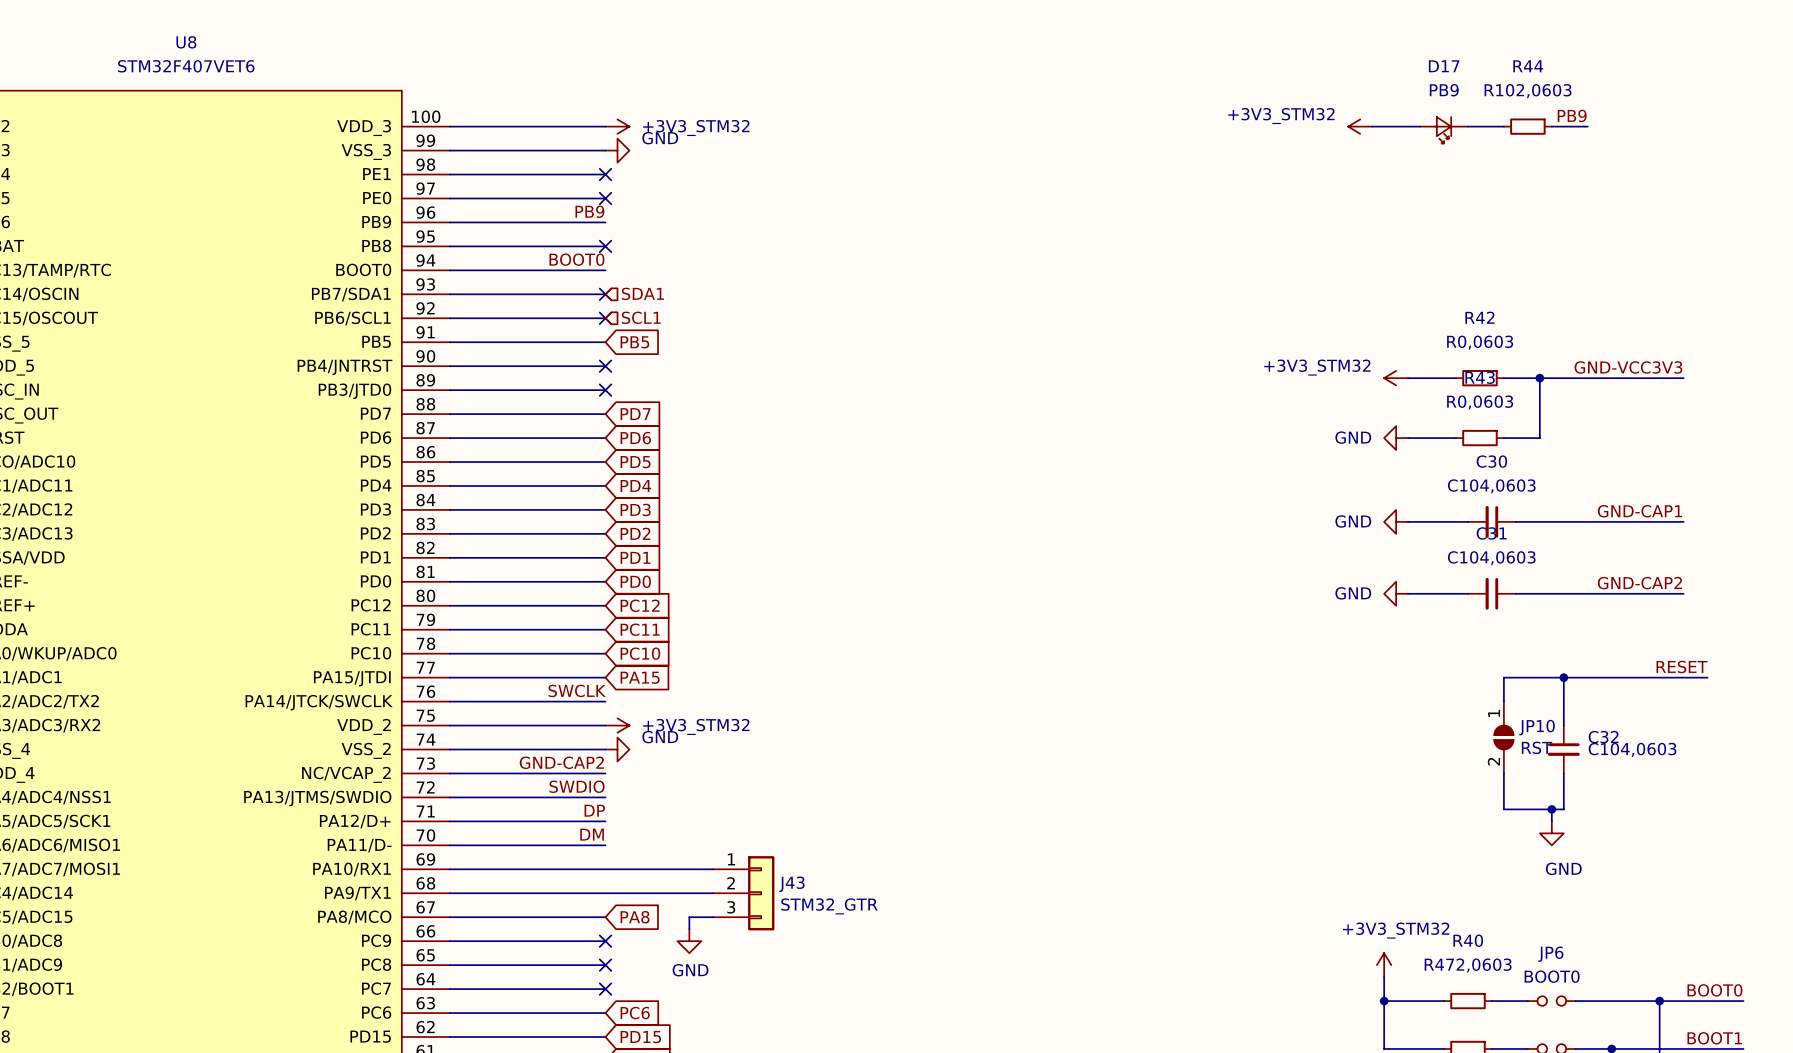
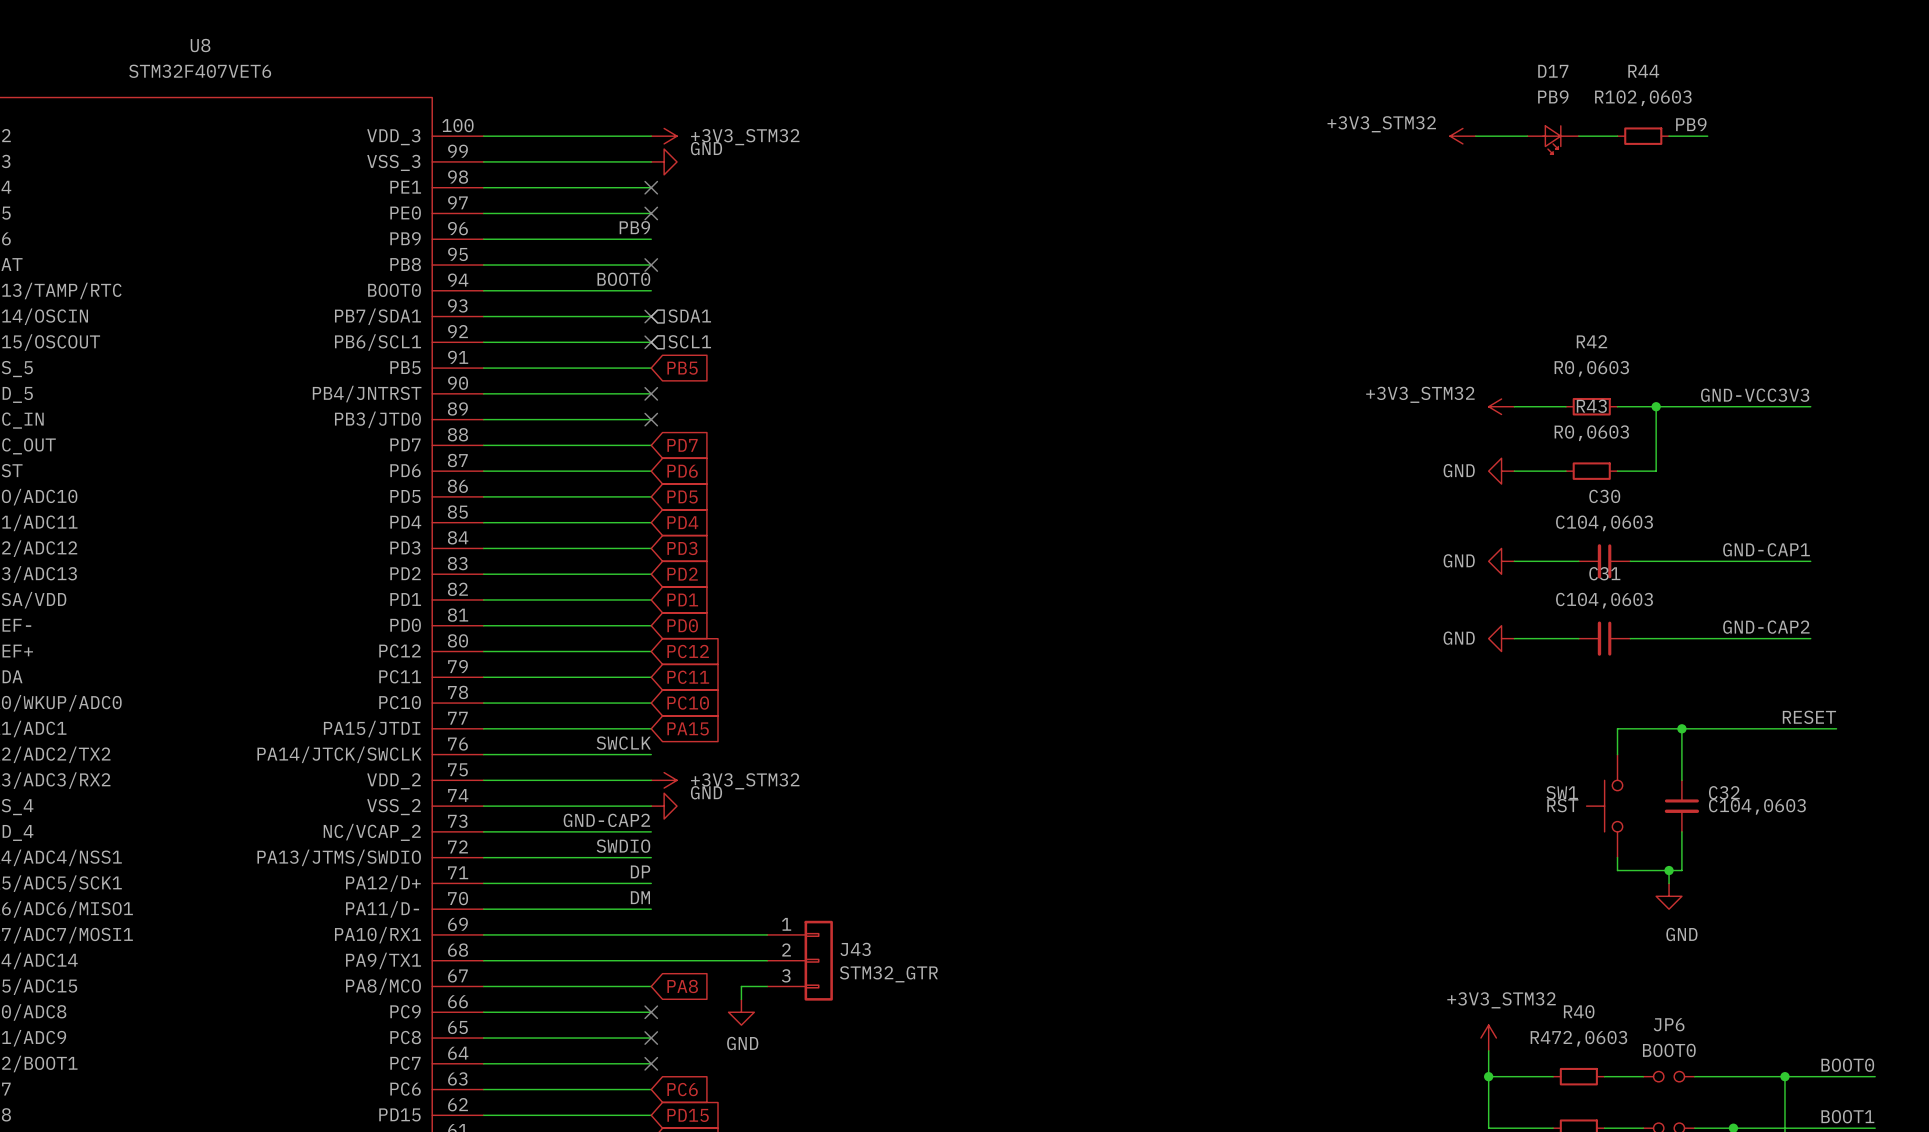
JP10: RST (1503, 737) -> none
SW1: none -> RST (1604, 806)

